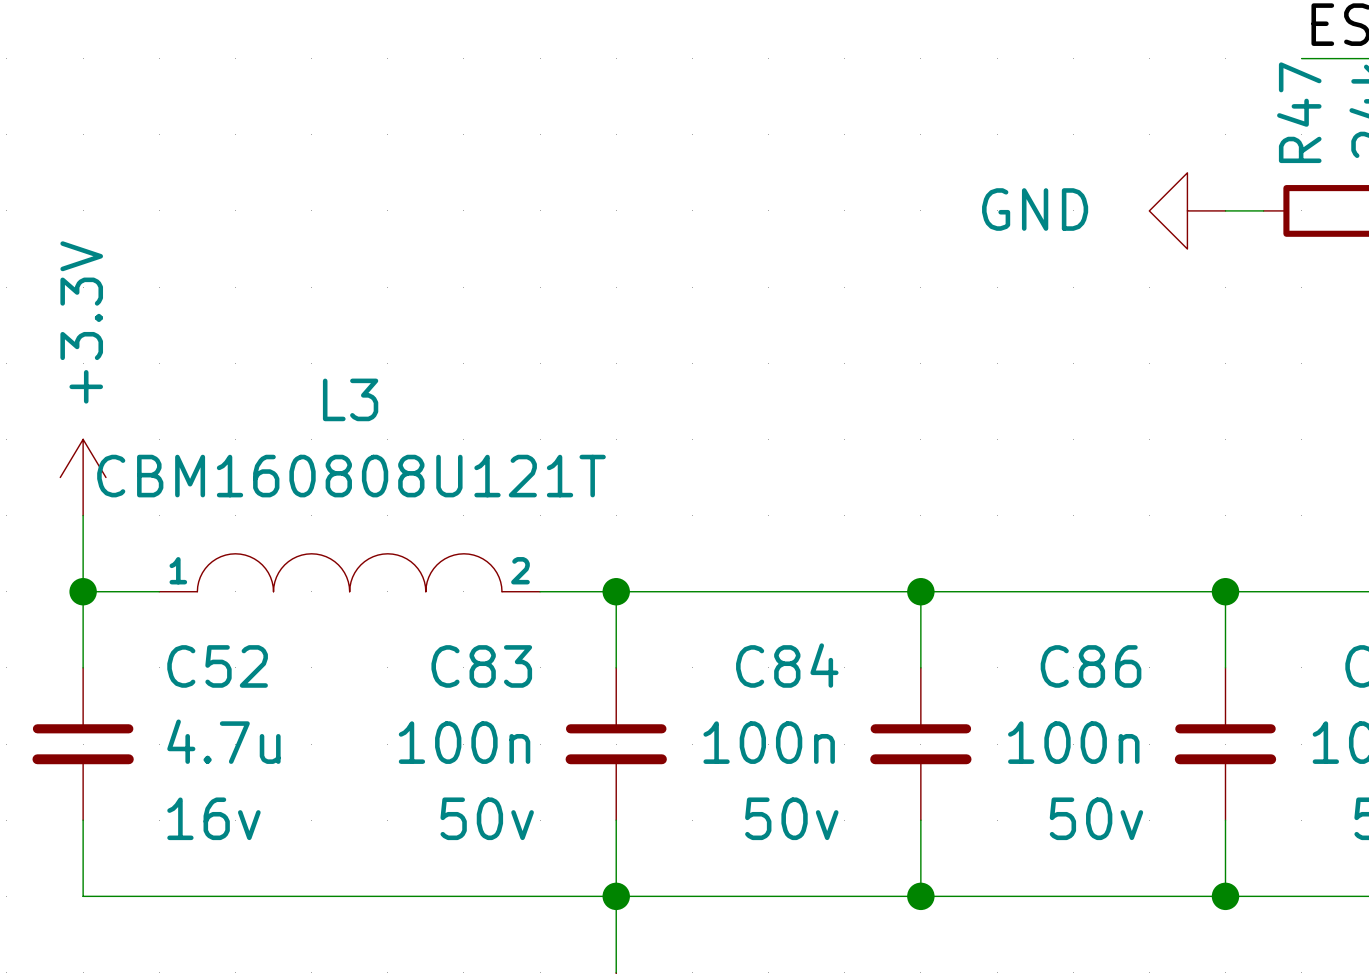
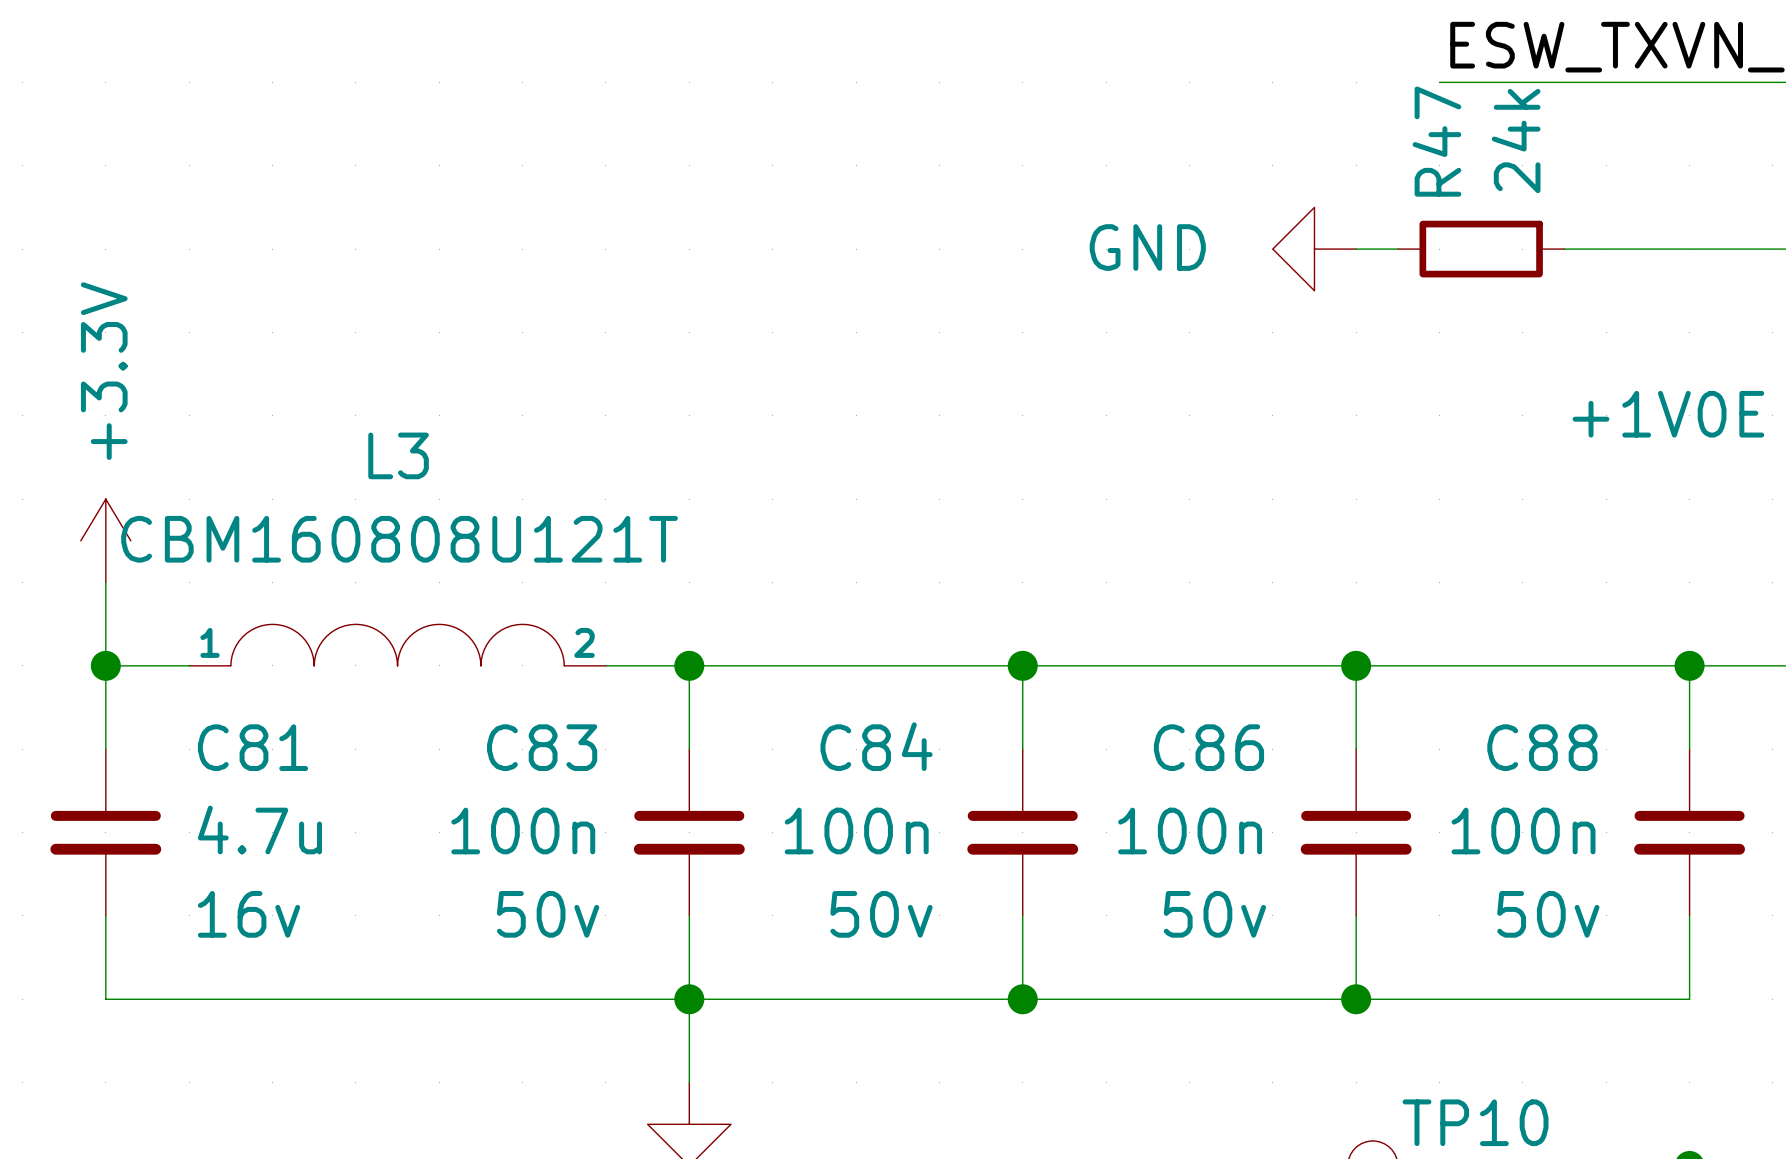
C52 name: C52 (217, 666) -> C81 (252, 747)

